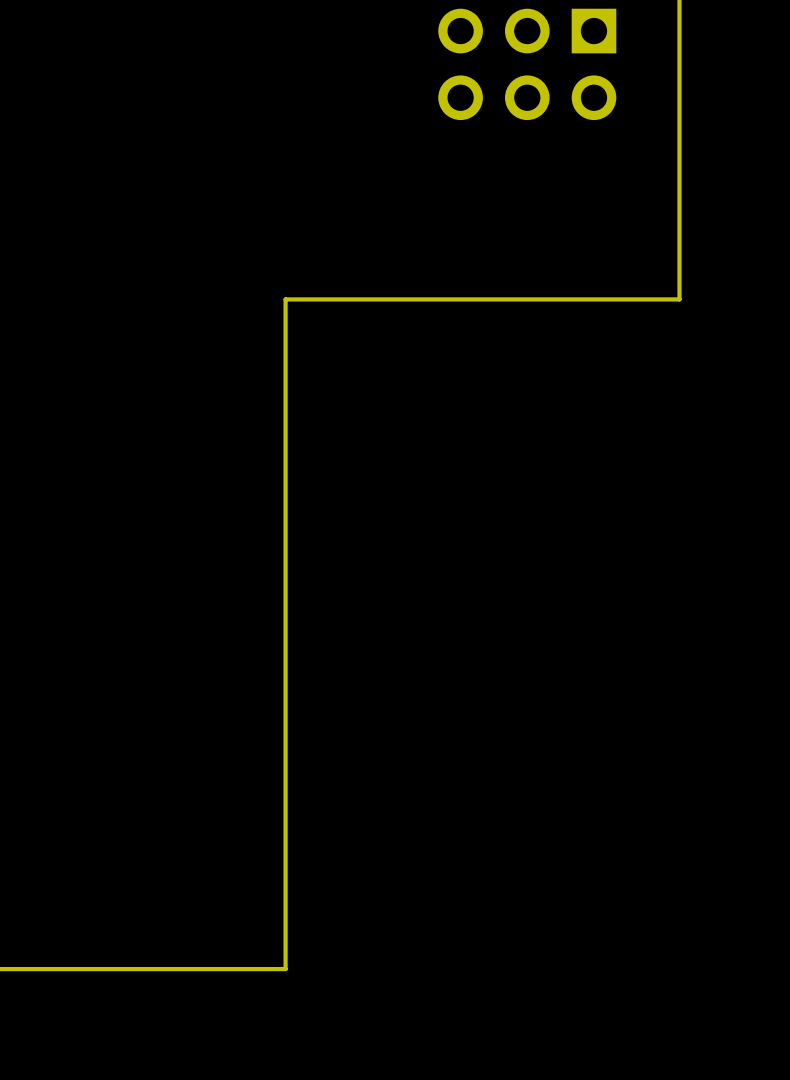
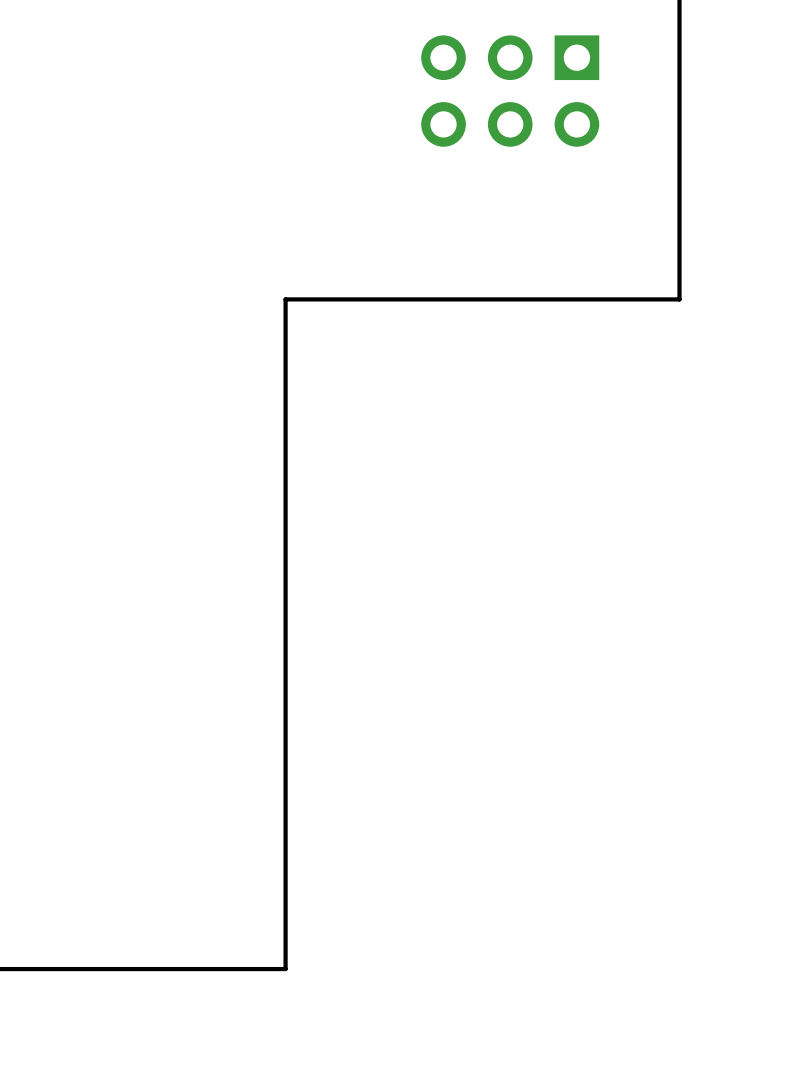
part position: (527, 64) -> (510, 91)

